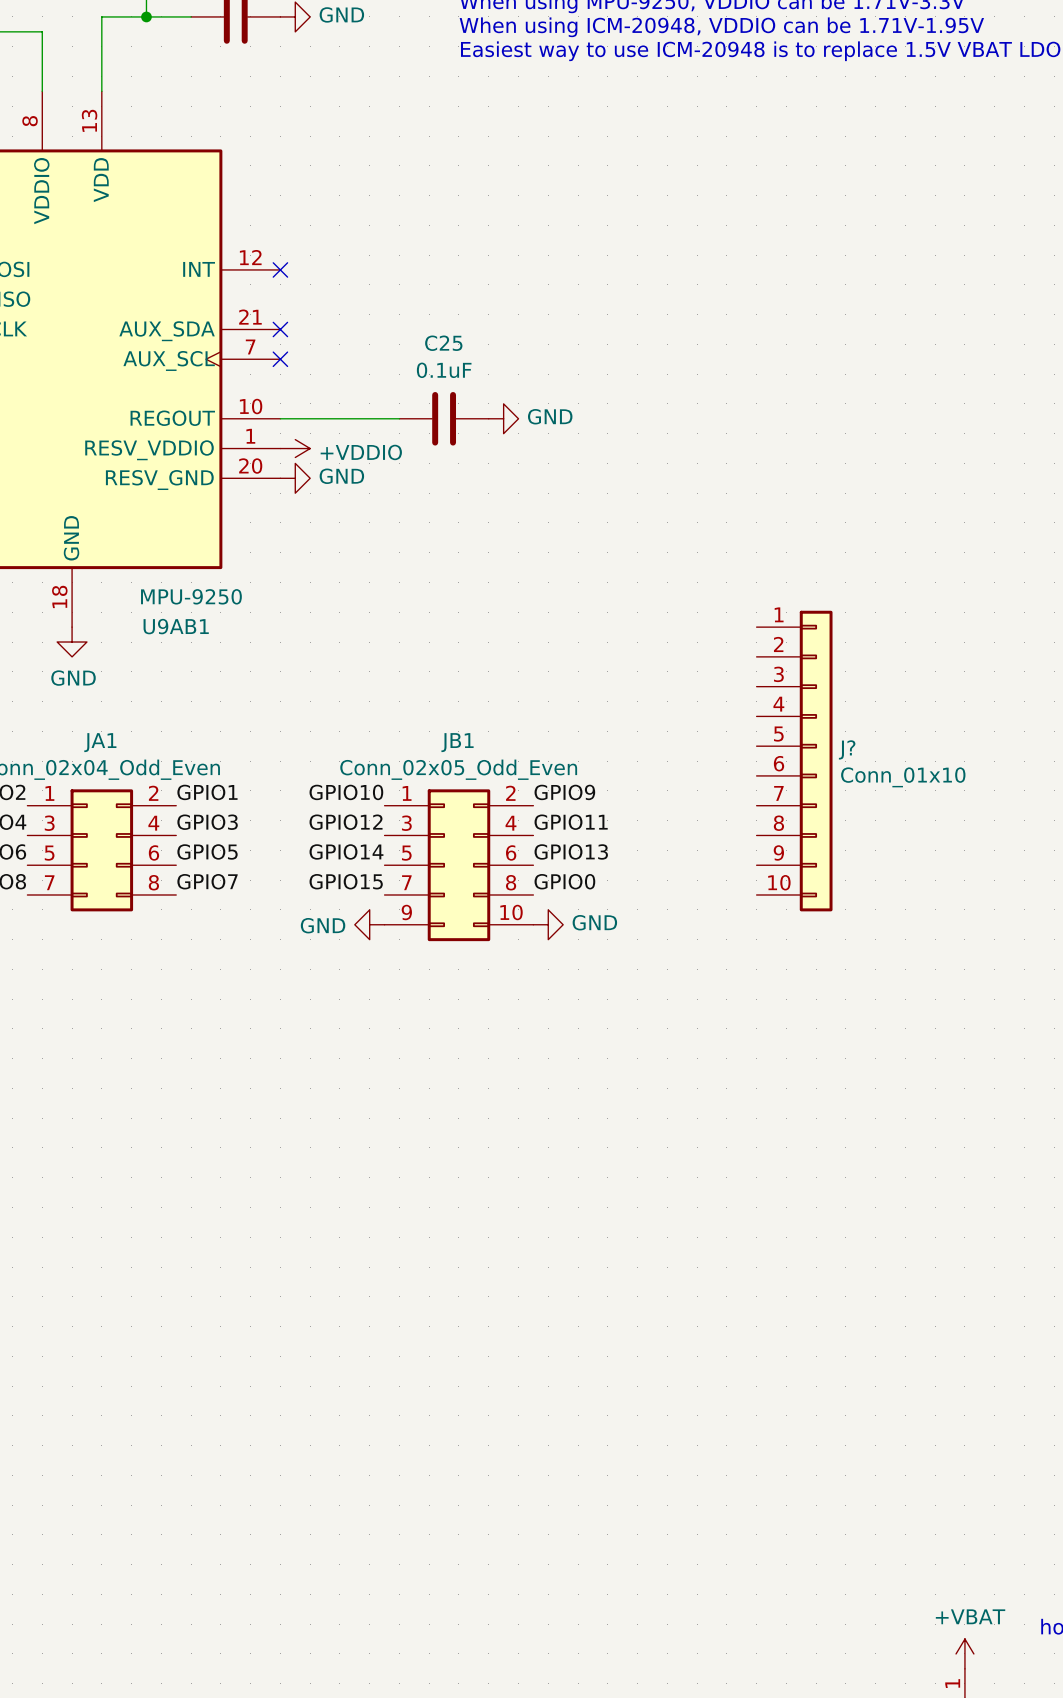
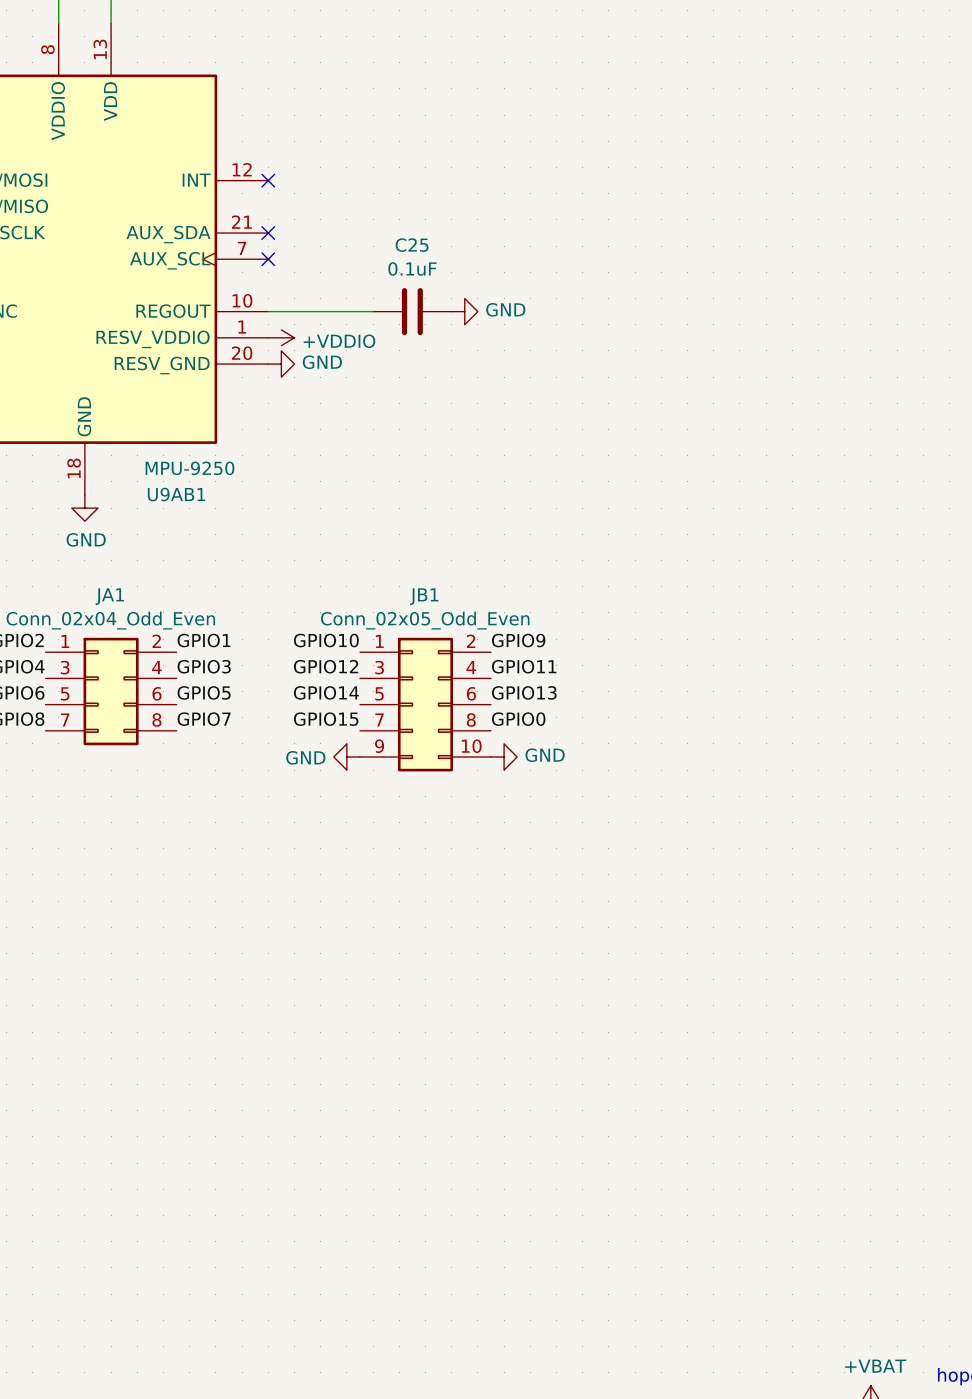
J?: Conn_01x10 (794, 761) -> none

